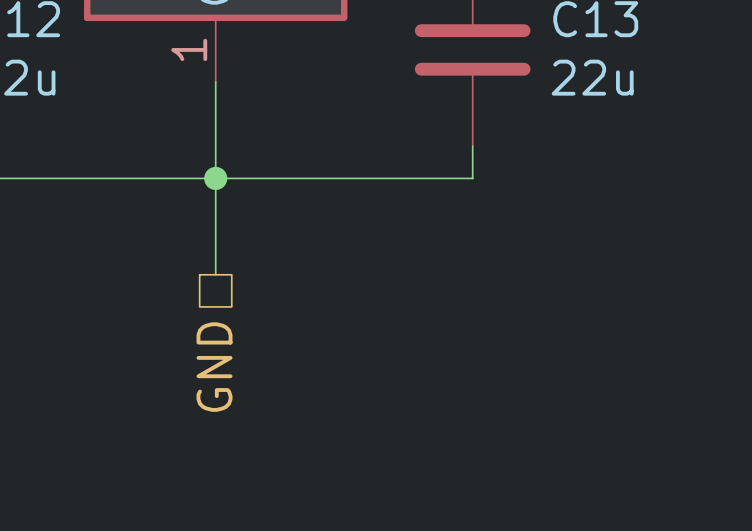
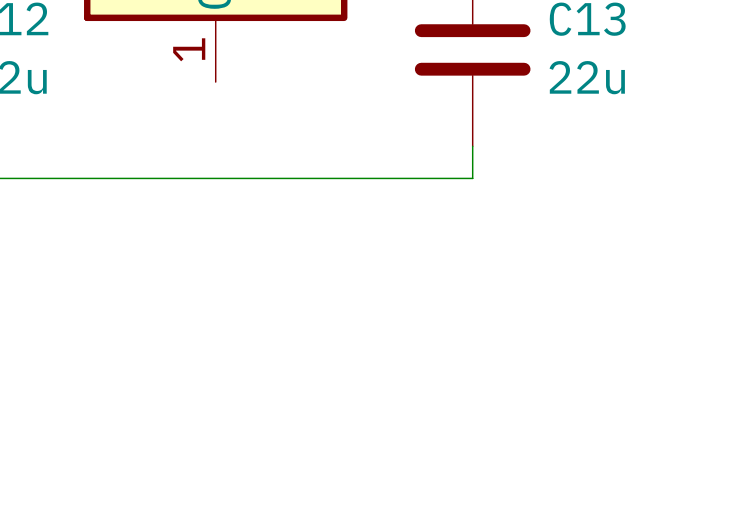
wire: (215, 82) (215, 274) -> none
junction: (215, 178) -> none
hierarchical label: GND (214, 367) -> none

